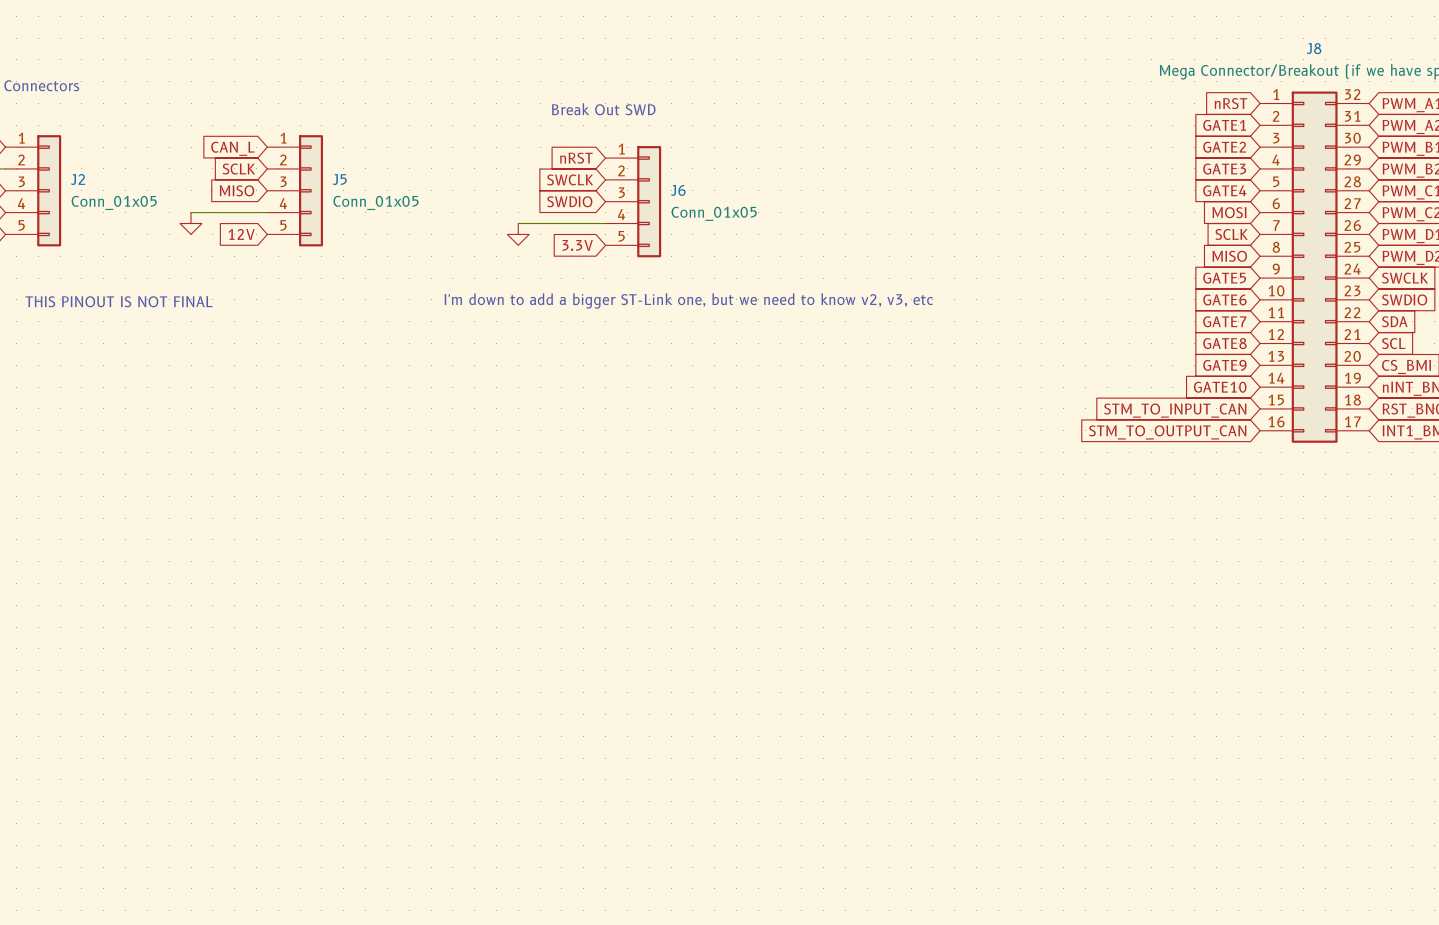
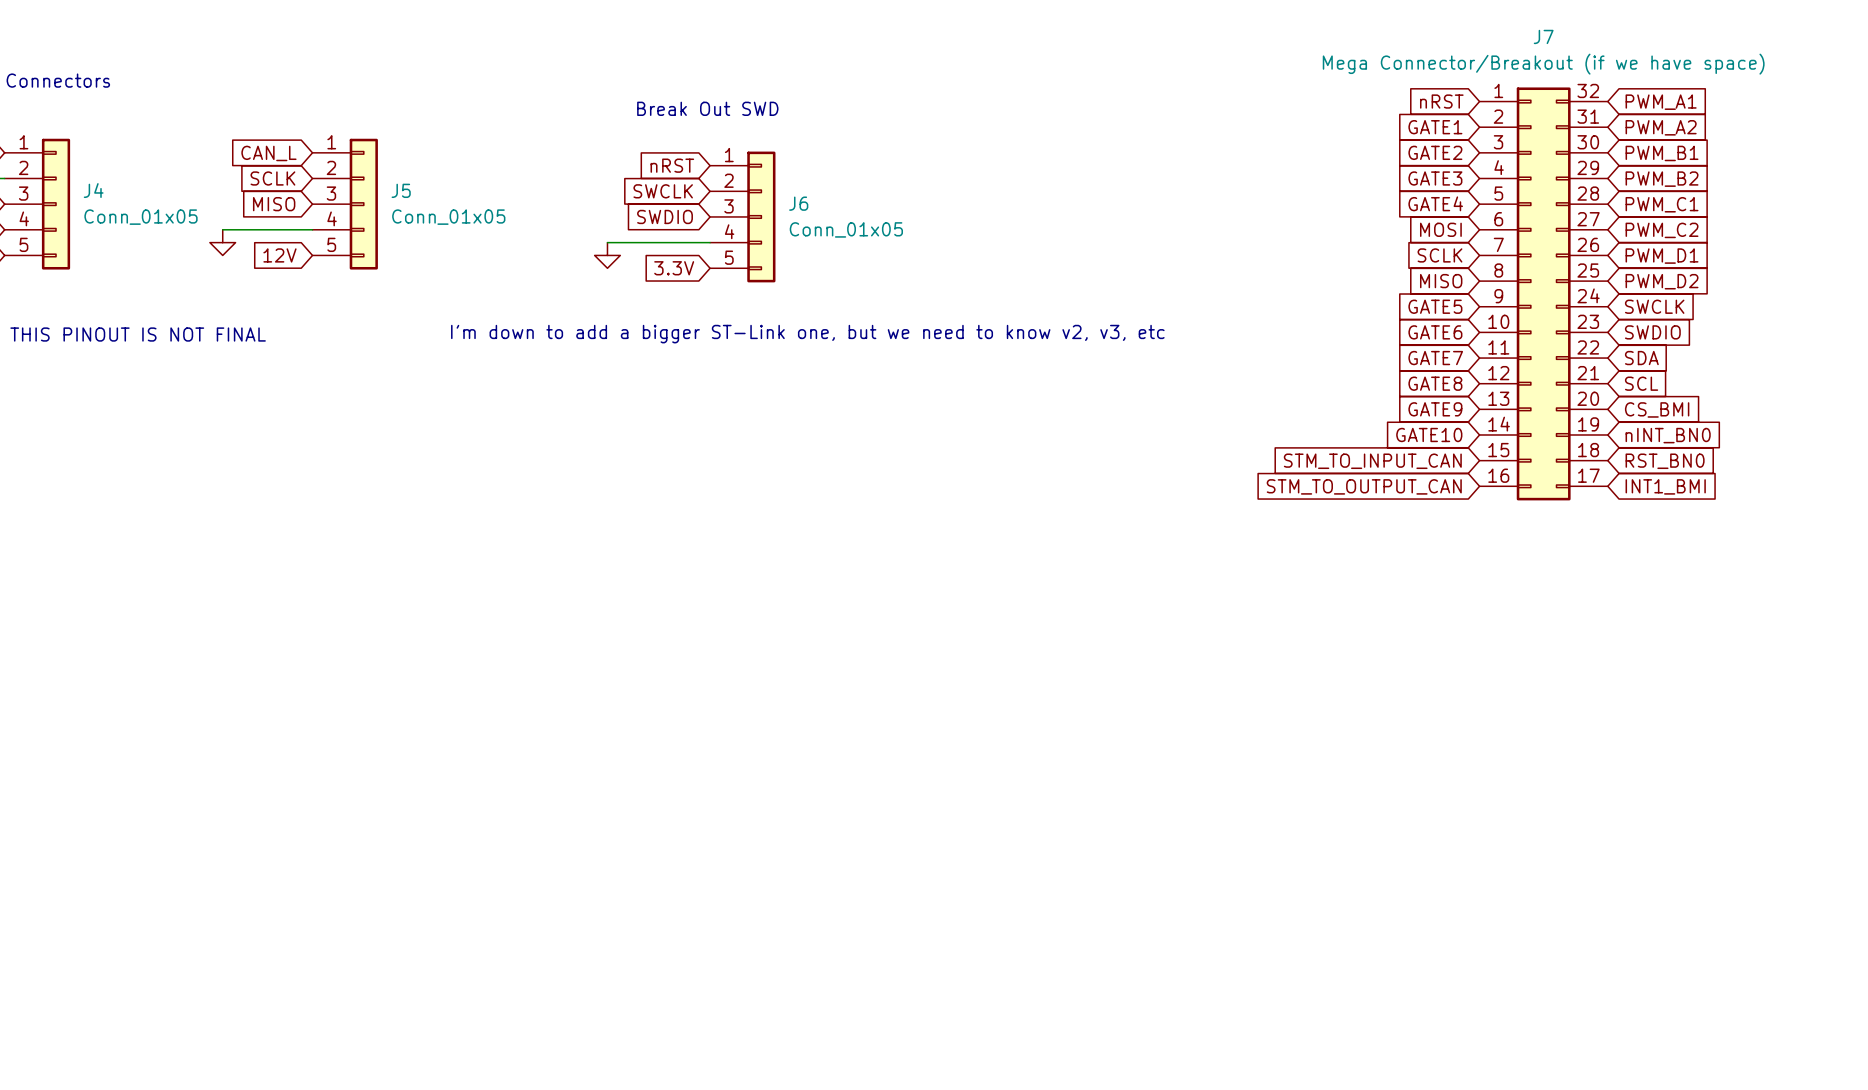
J8 name: J8 (1314, 48) -> J7 (1543, 36)
J2 name: J2 (78, 179) -> J4 (93, 190)

